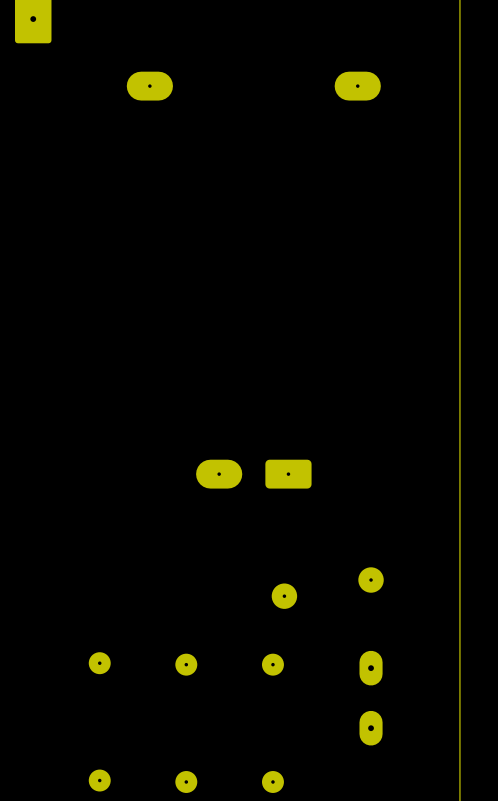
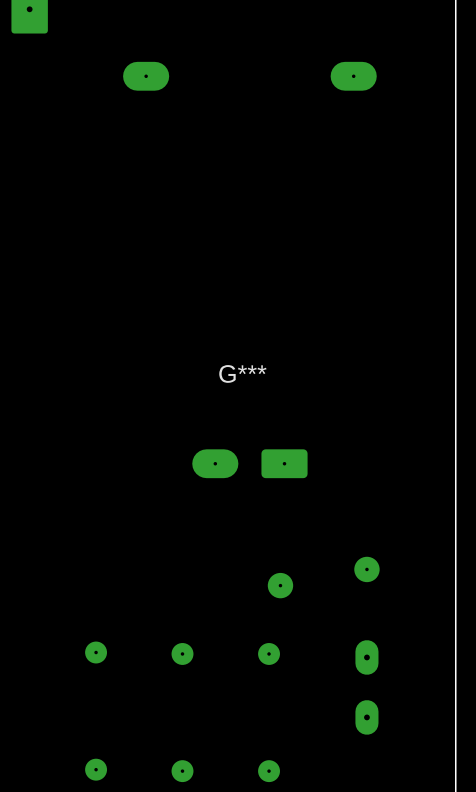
G***: none -> (242, 373)

